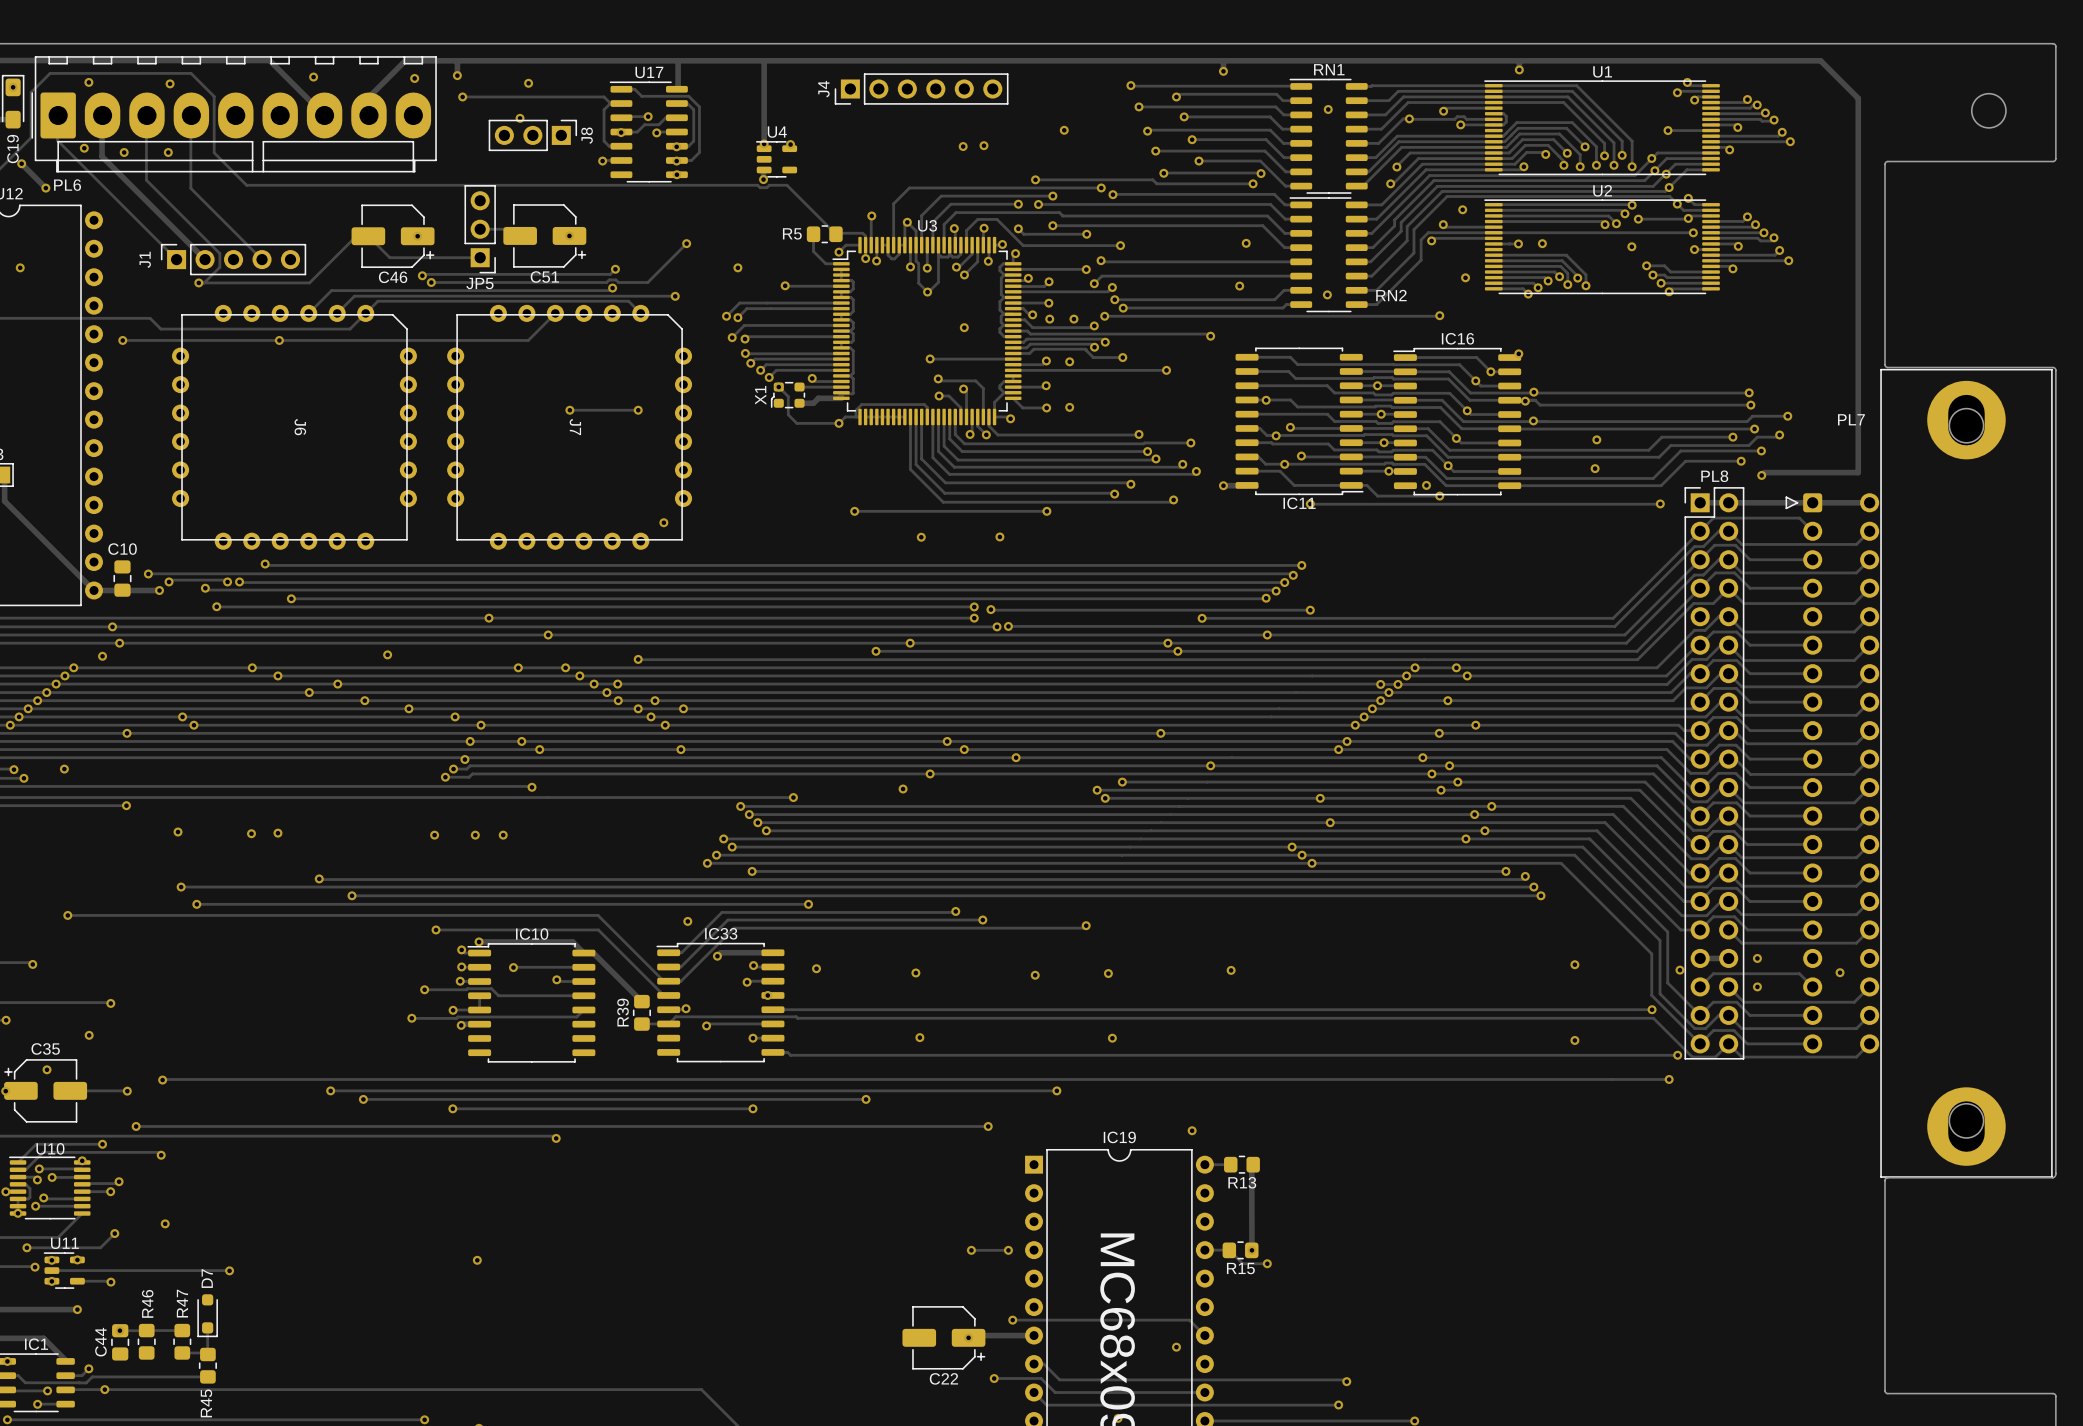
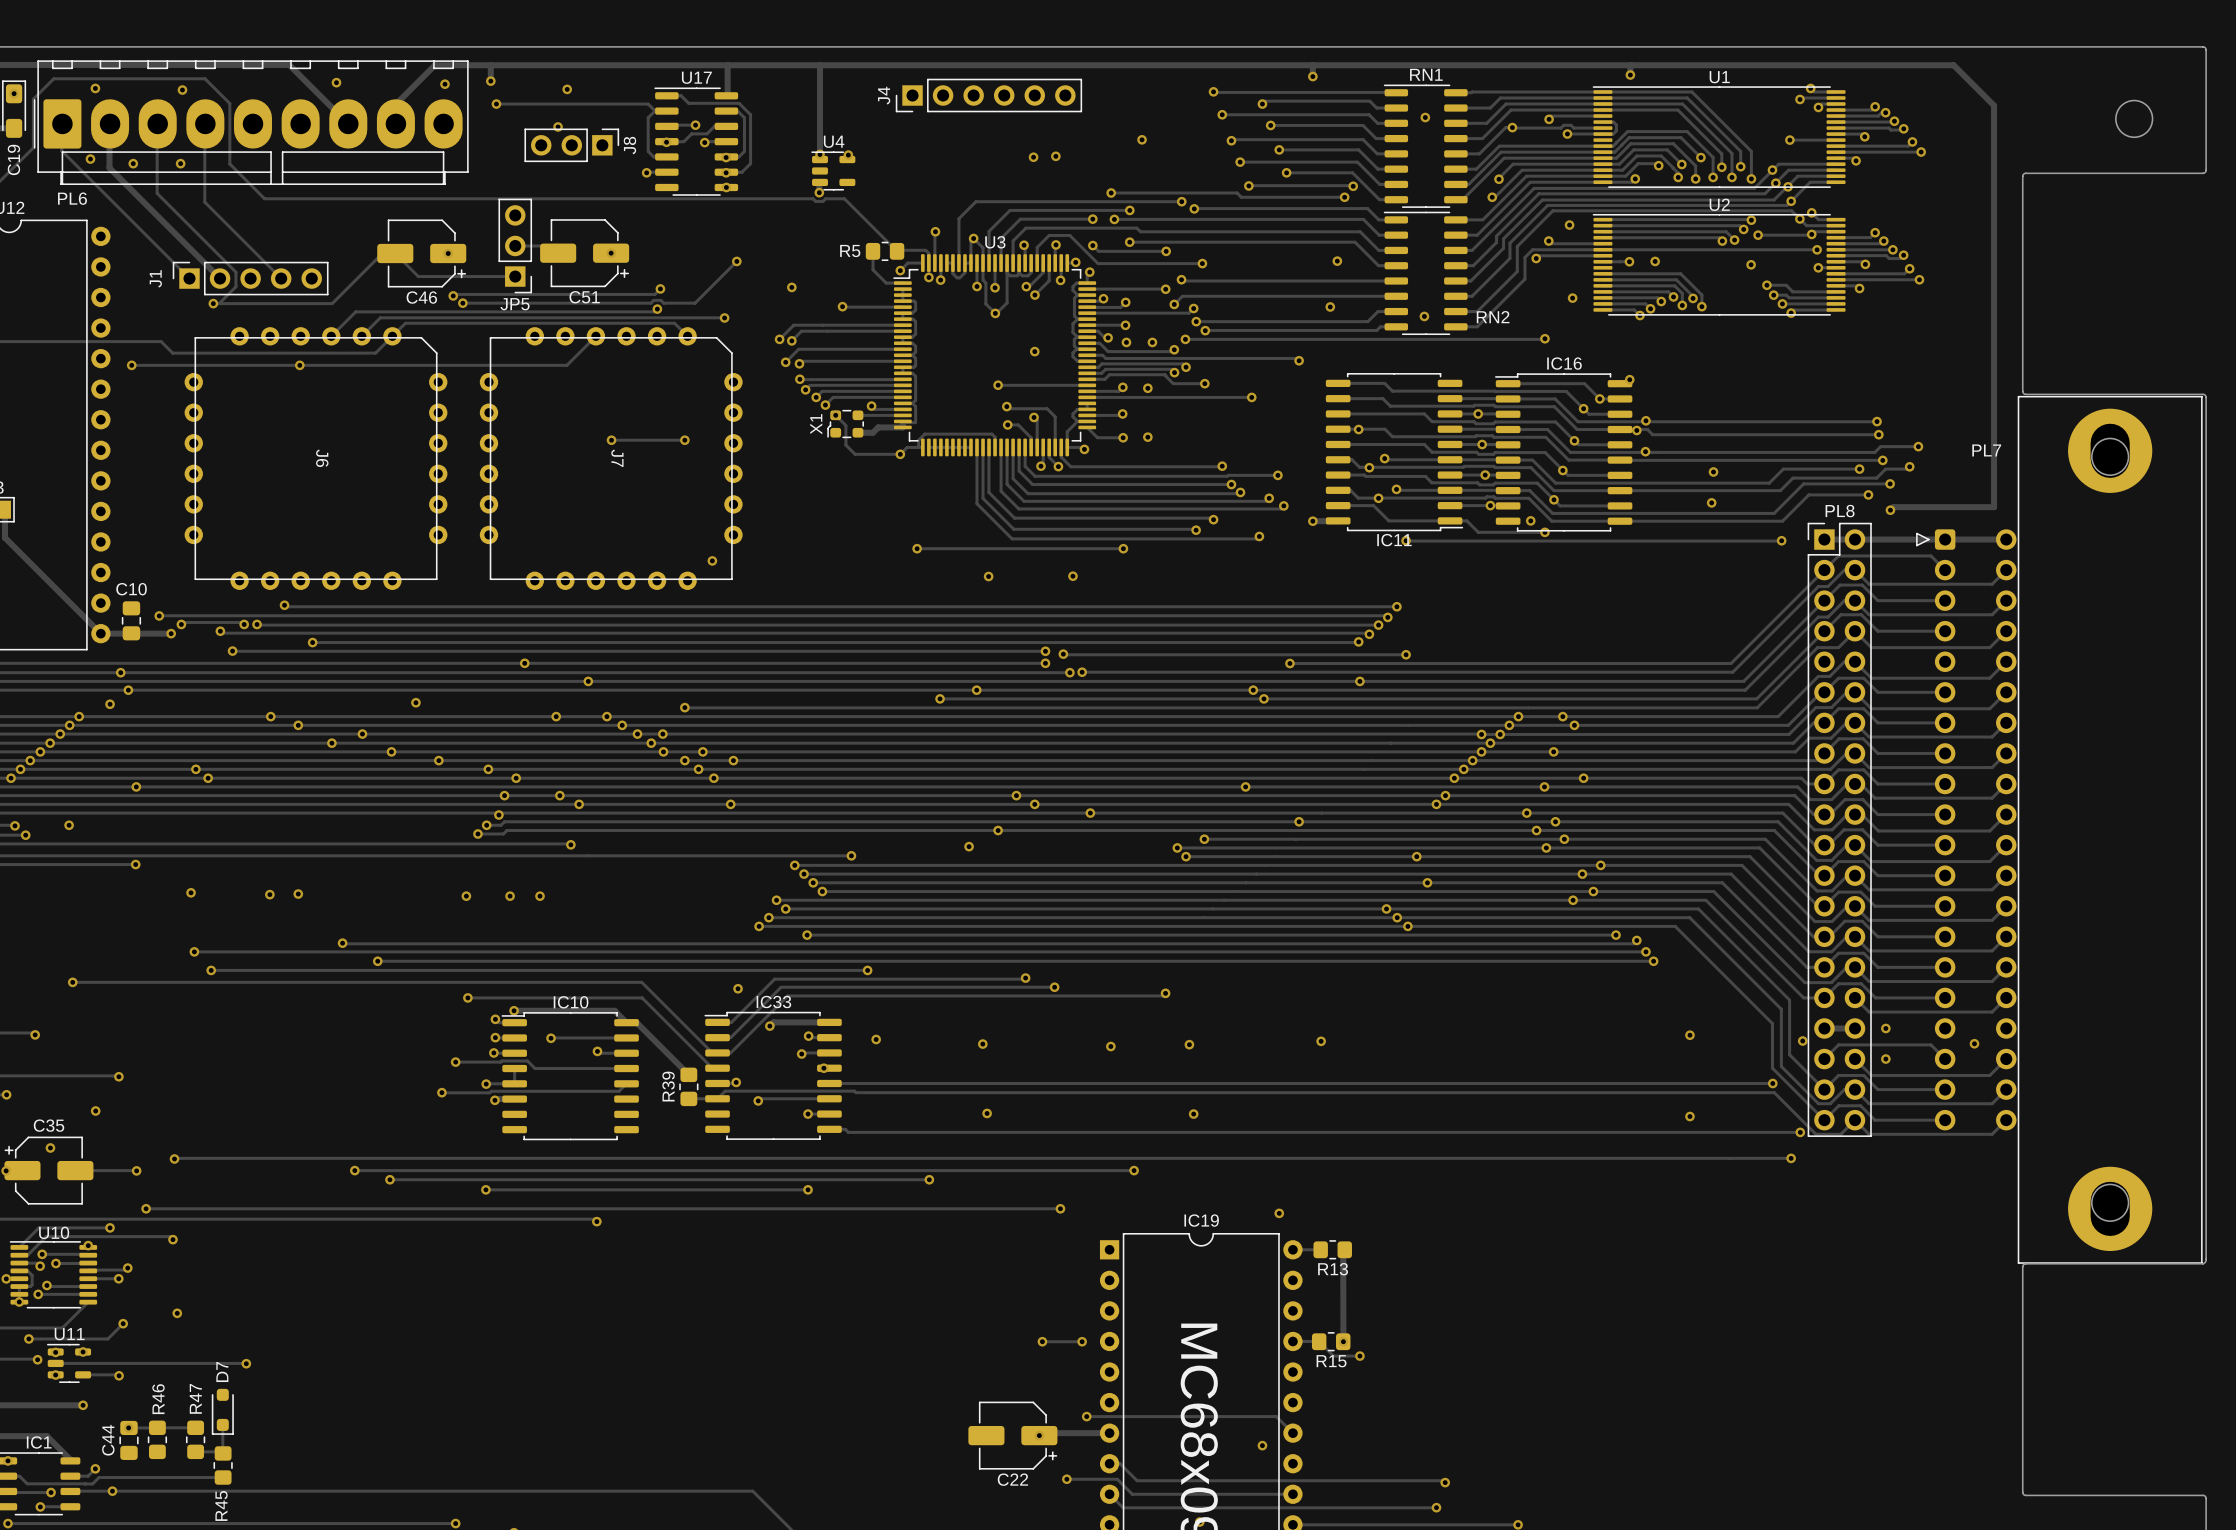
track: (21, 163) (45, 188) -> none
via: (21, 163) -> none
via: (45, 188) -> none
via: (20, 267) -> none
via: (477, 1260) -> none

